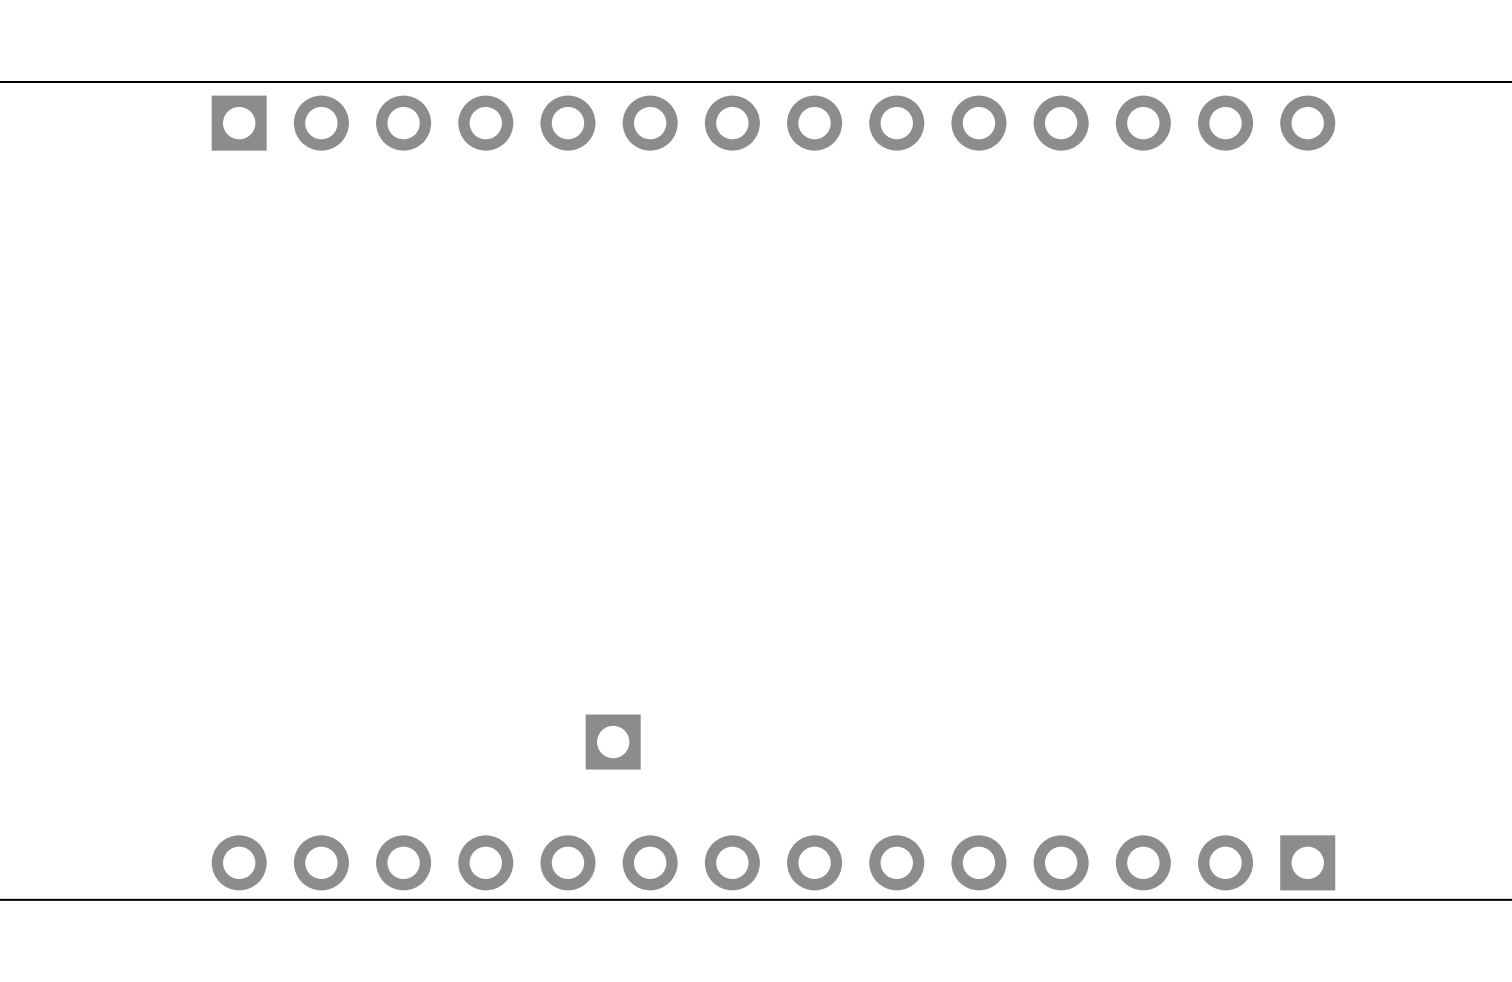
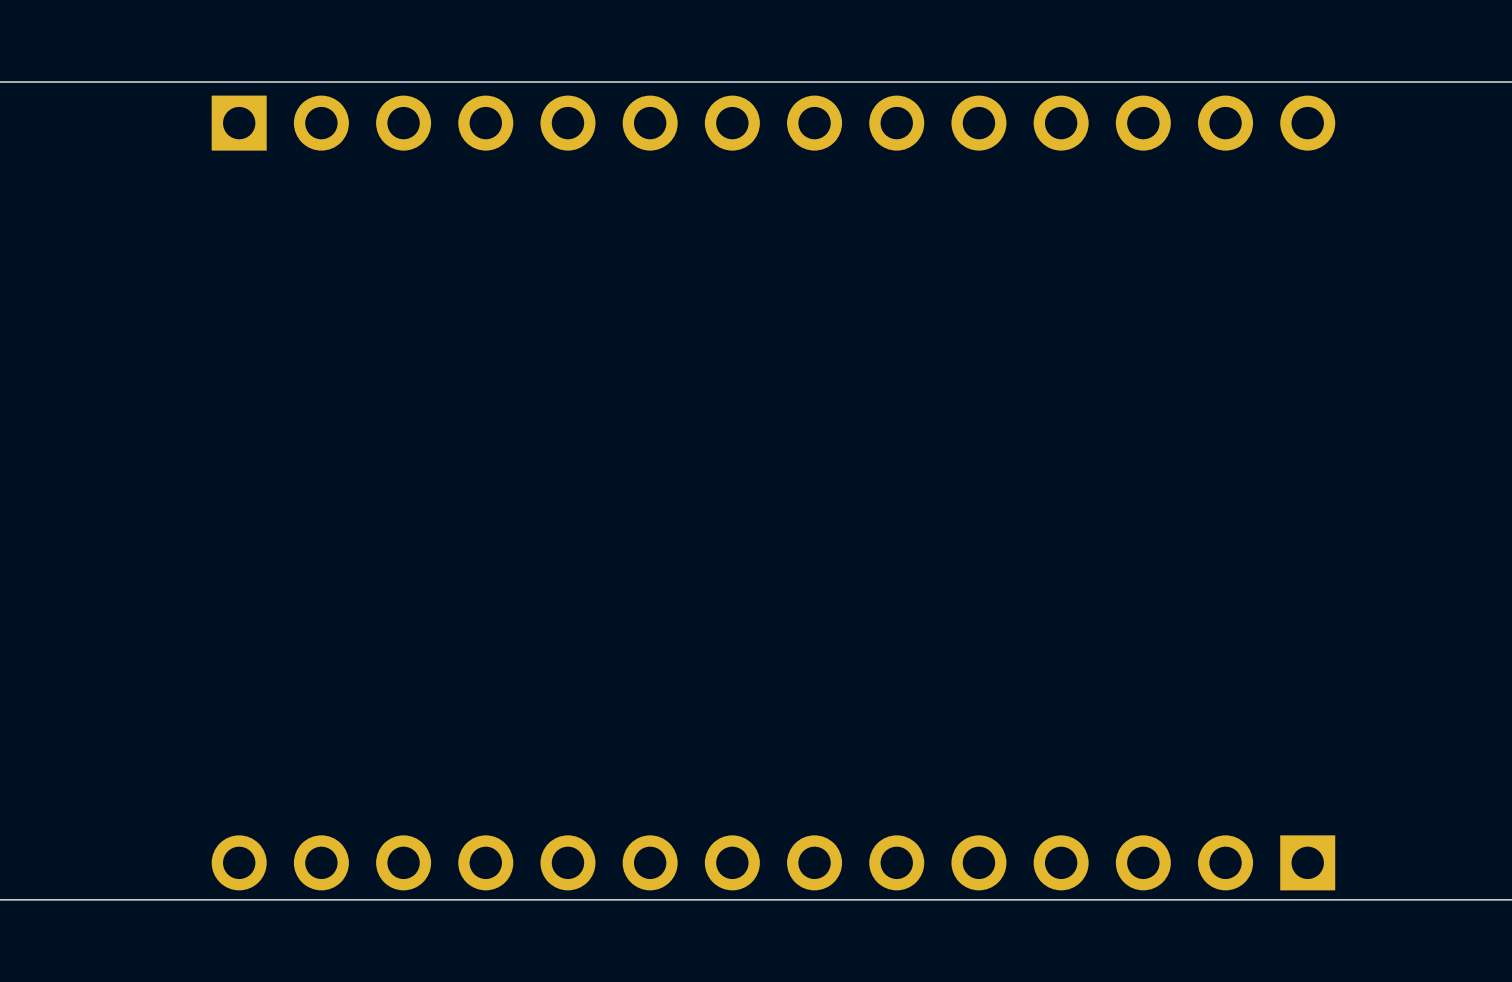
part: (613, 742) -> none

